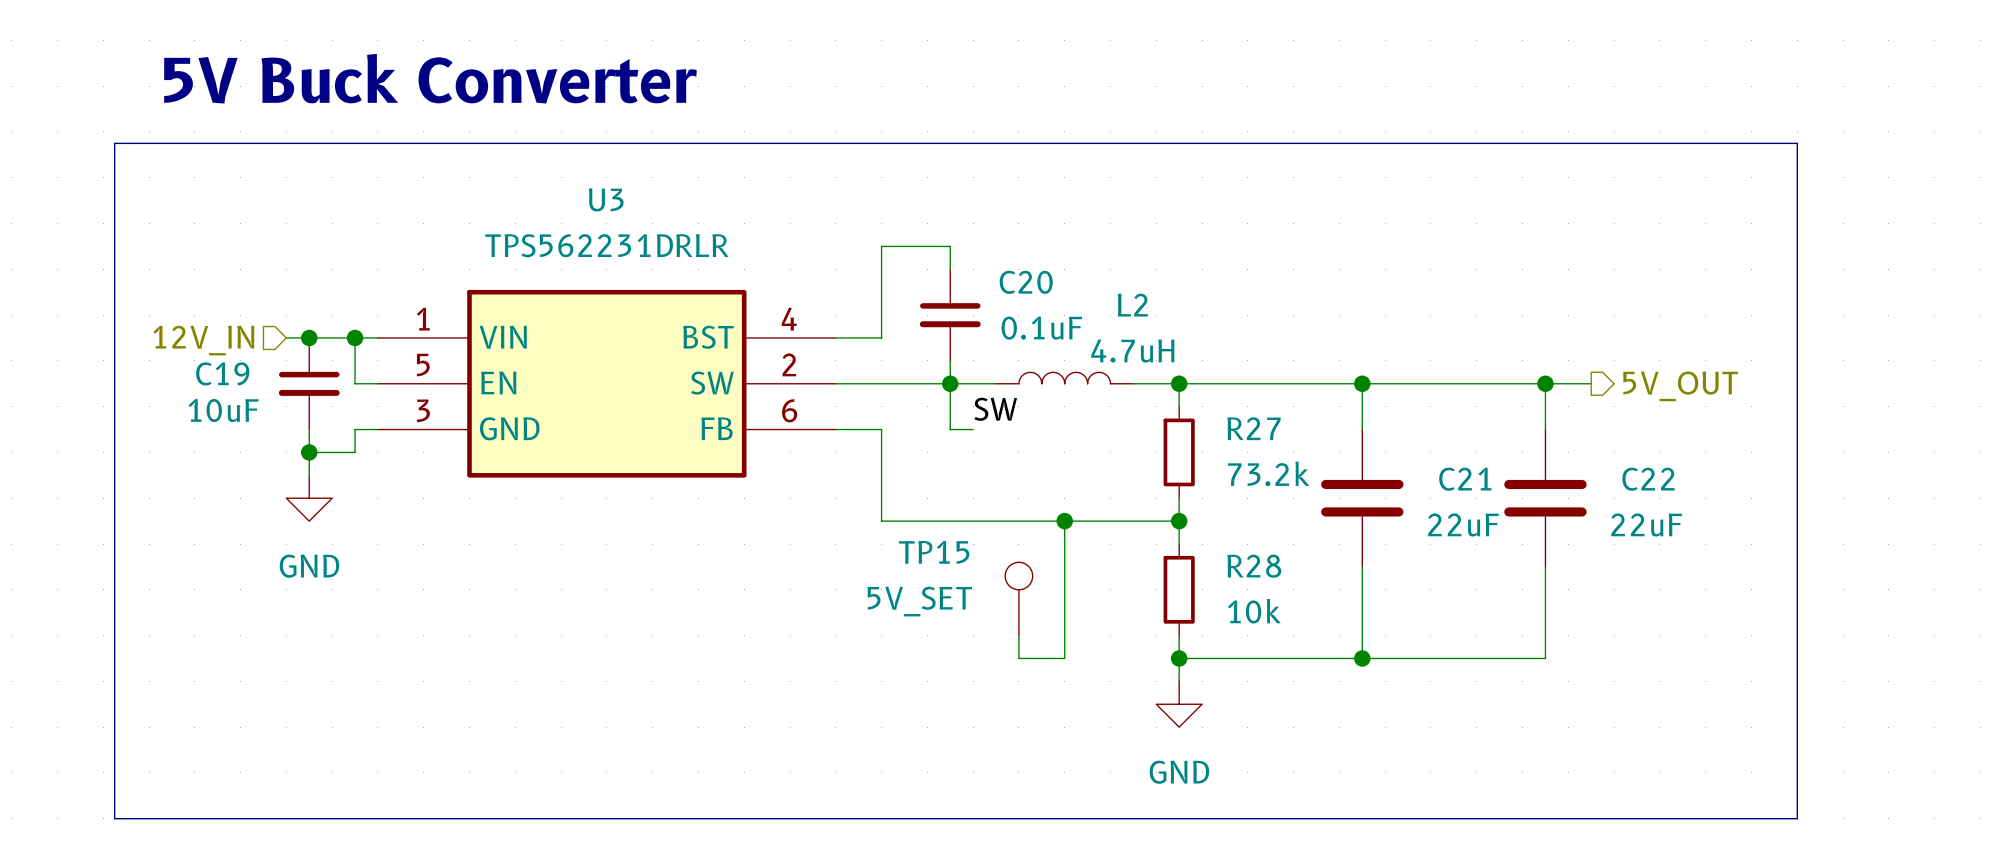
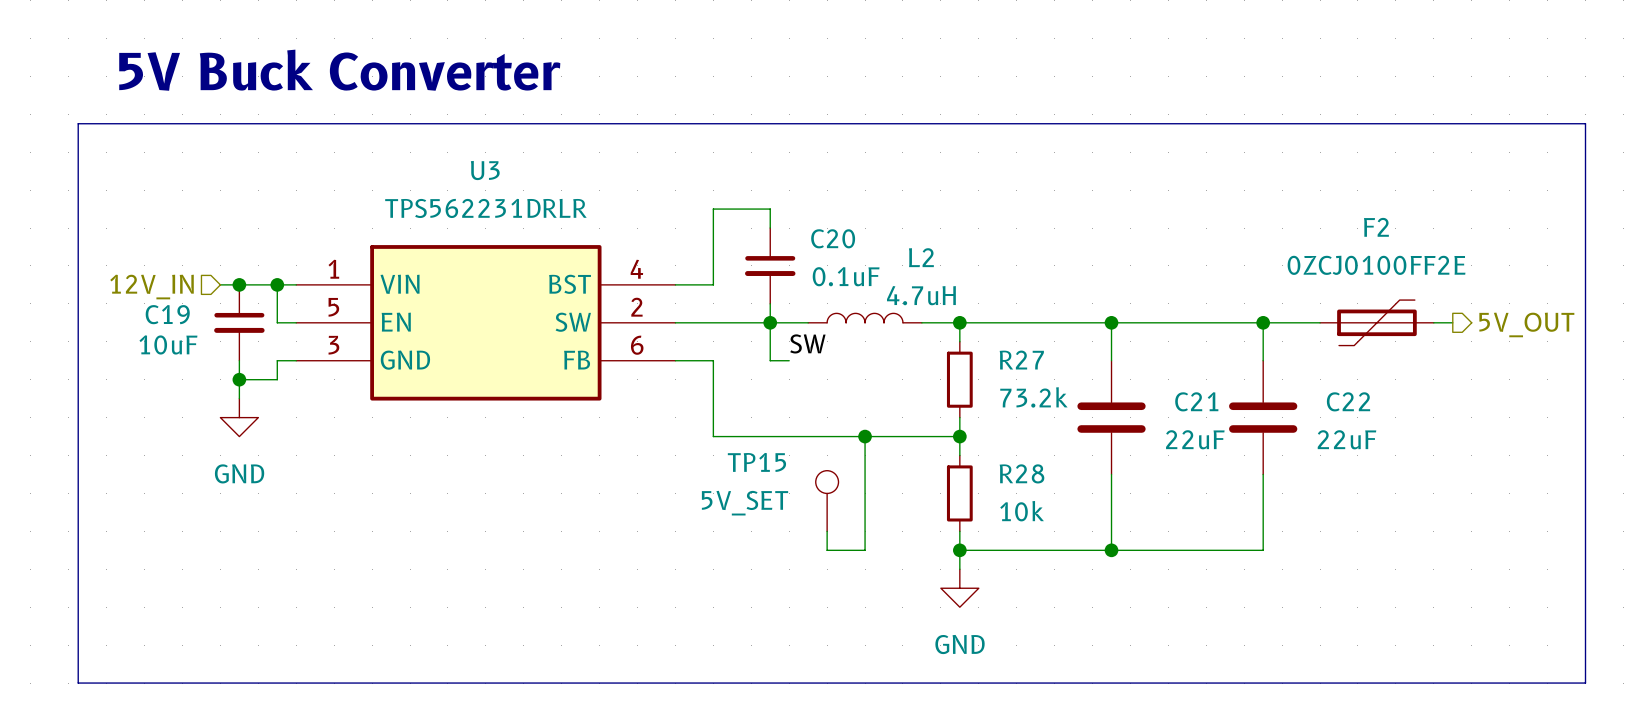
line: (1797, 143) (1797, 818) -> (1471, 123) (1585, 123) (1585, 683) (1471, 683)
wire: none -> (1301, 322) (1320, 322)
F2: none -> 0ZCJ0100FF2E (1376, 322)
wire: none -> (1433, 322) (1452, 322)
hierarchical label position: 5V_OUT (1680, 386) -> 5V_OUT (1526, 324)

